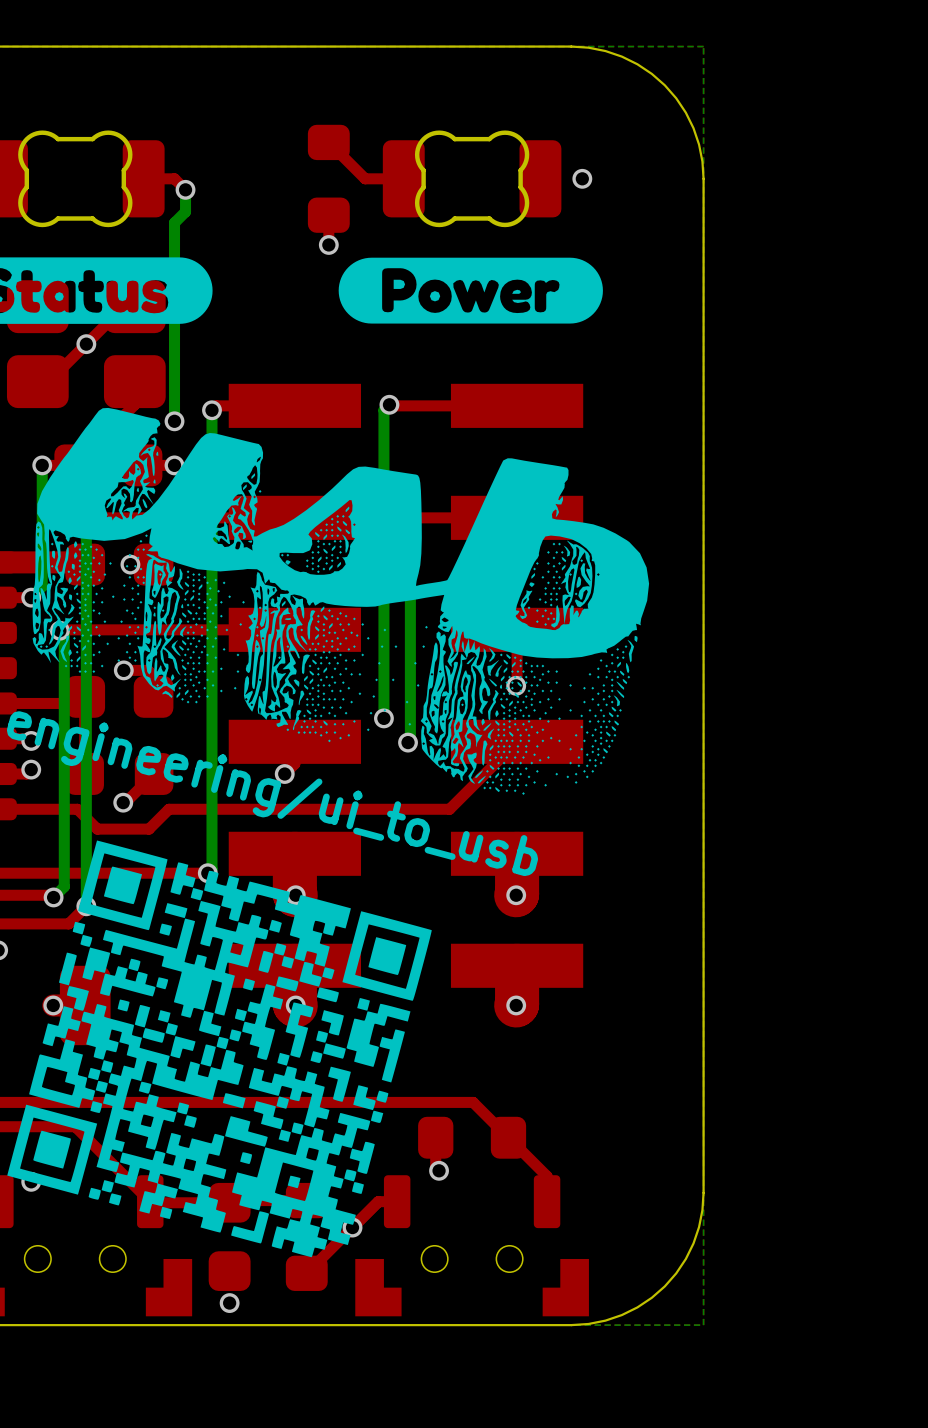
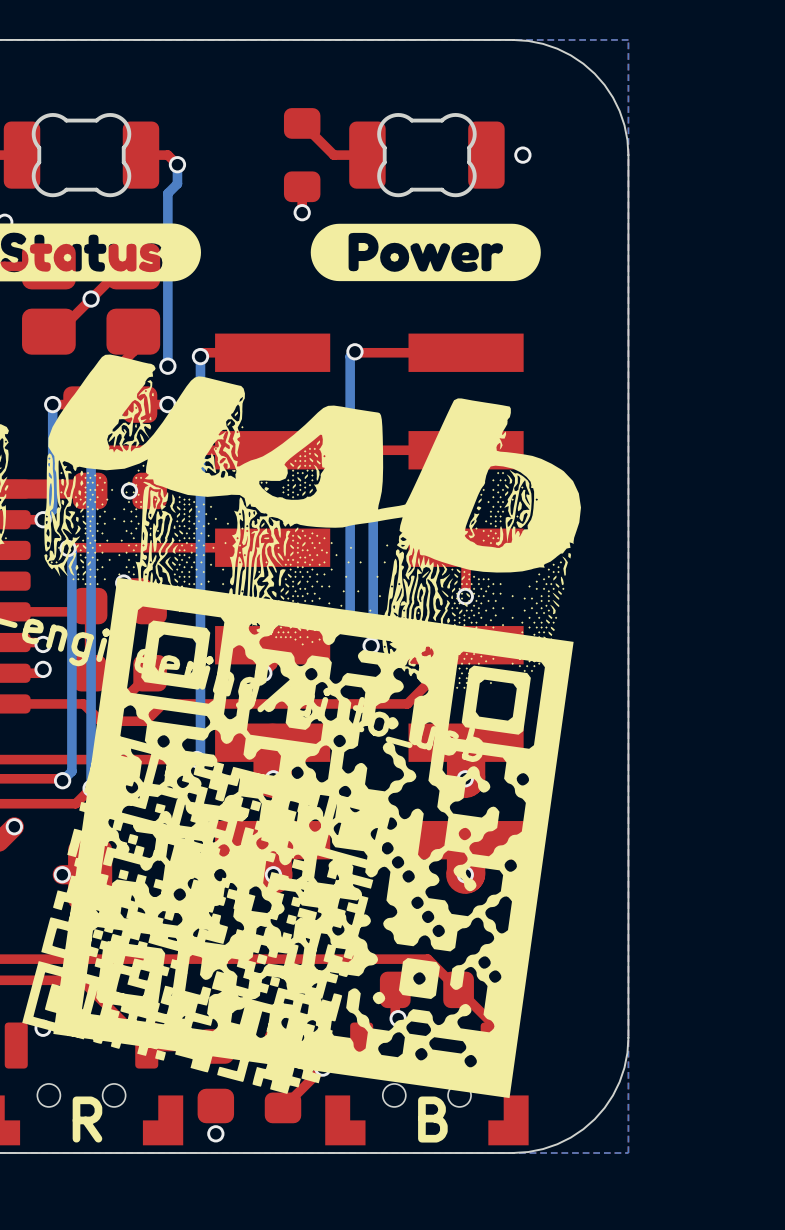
drawing: none -> [53, 577, 574, 1099]
text: none -> R (87, 1119)
text: none -> B (432, 1119)

